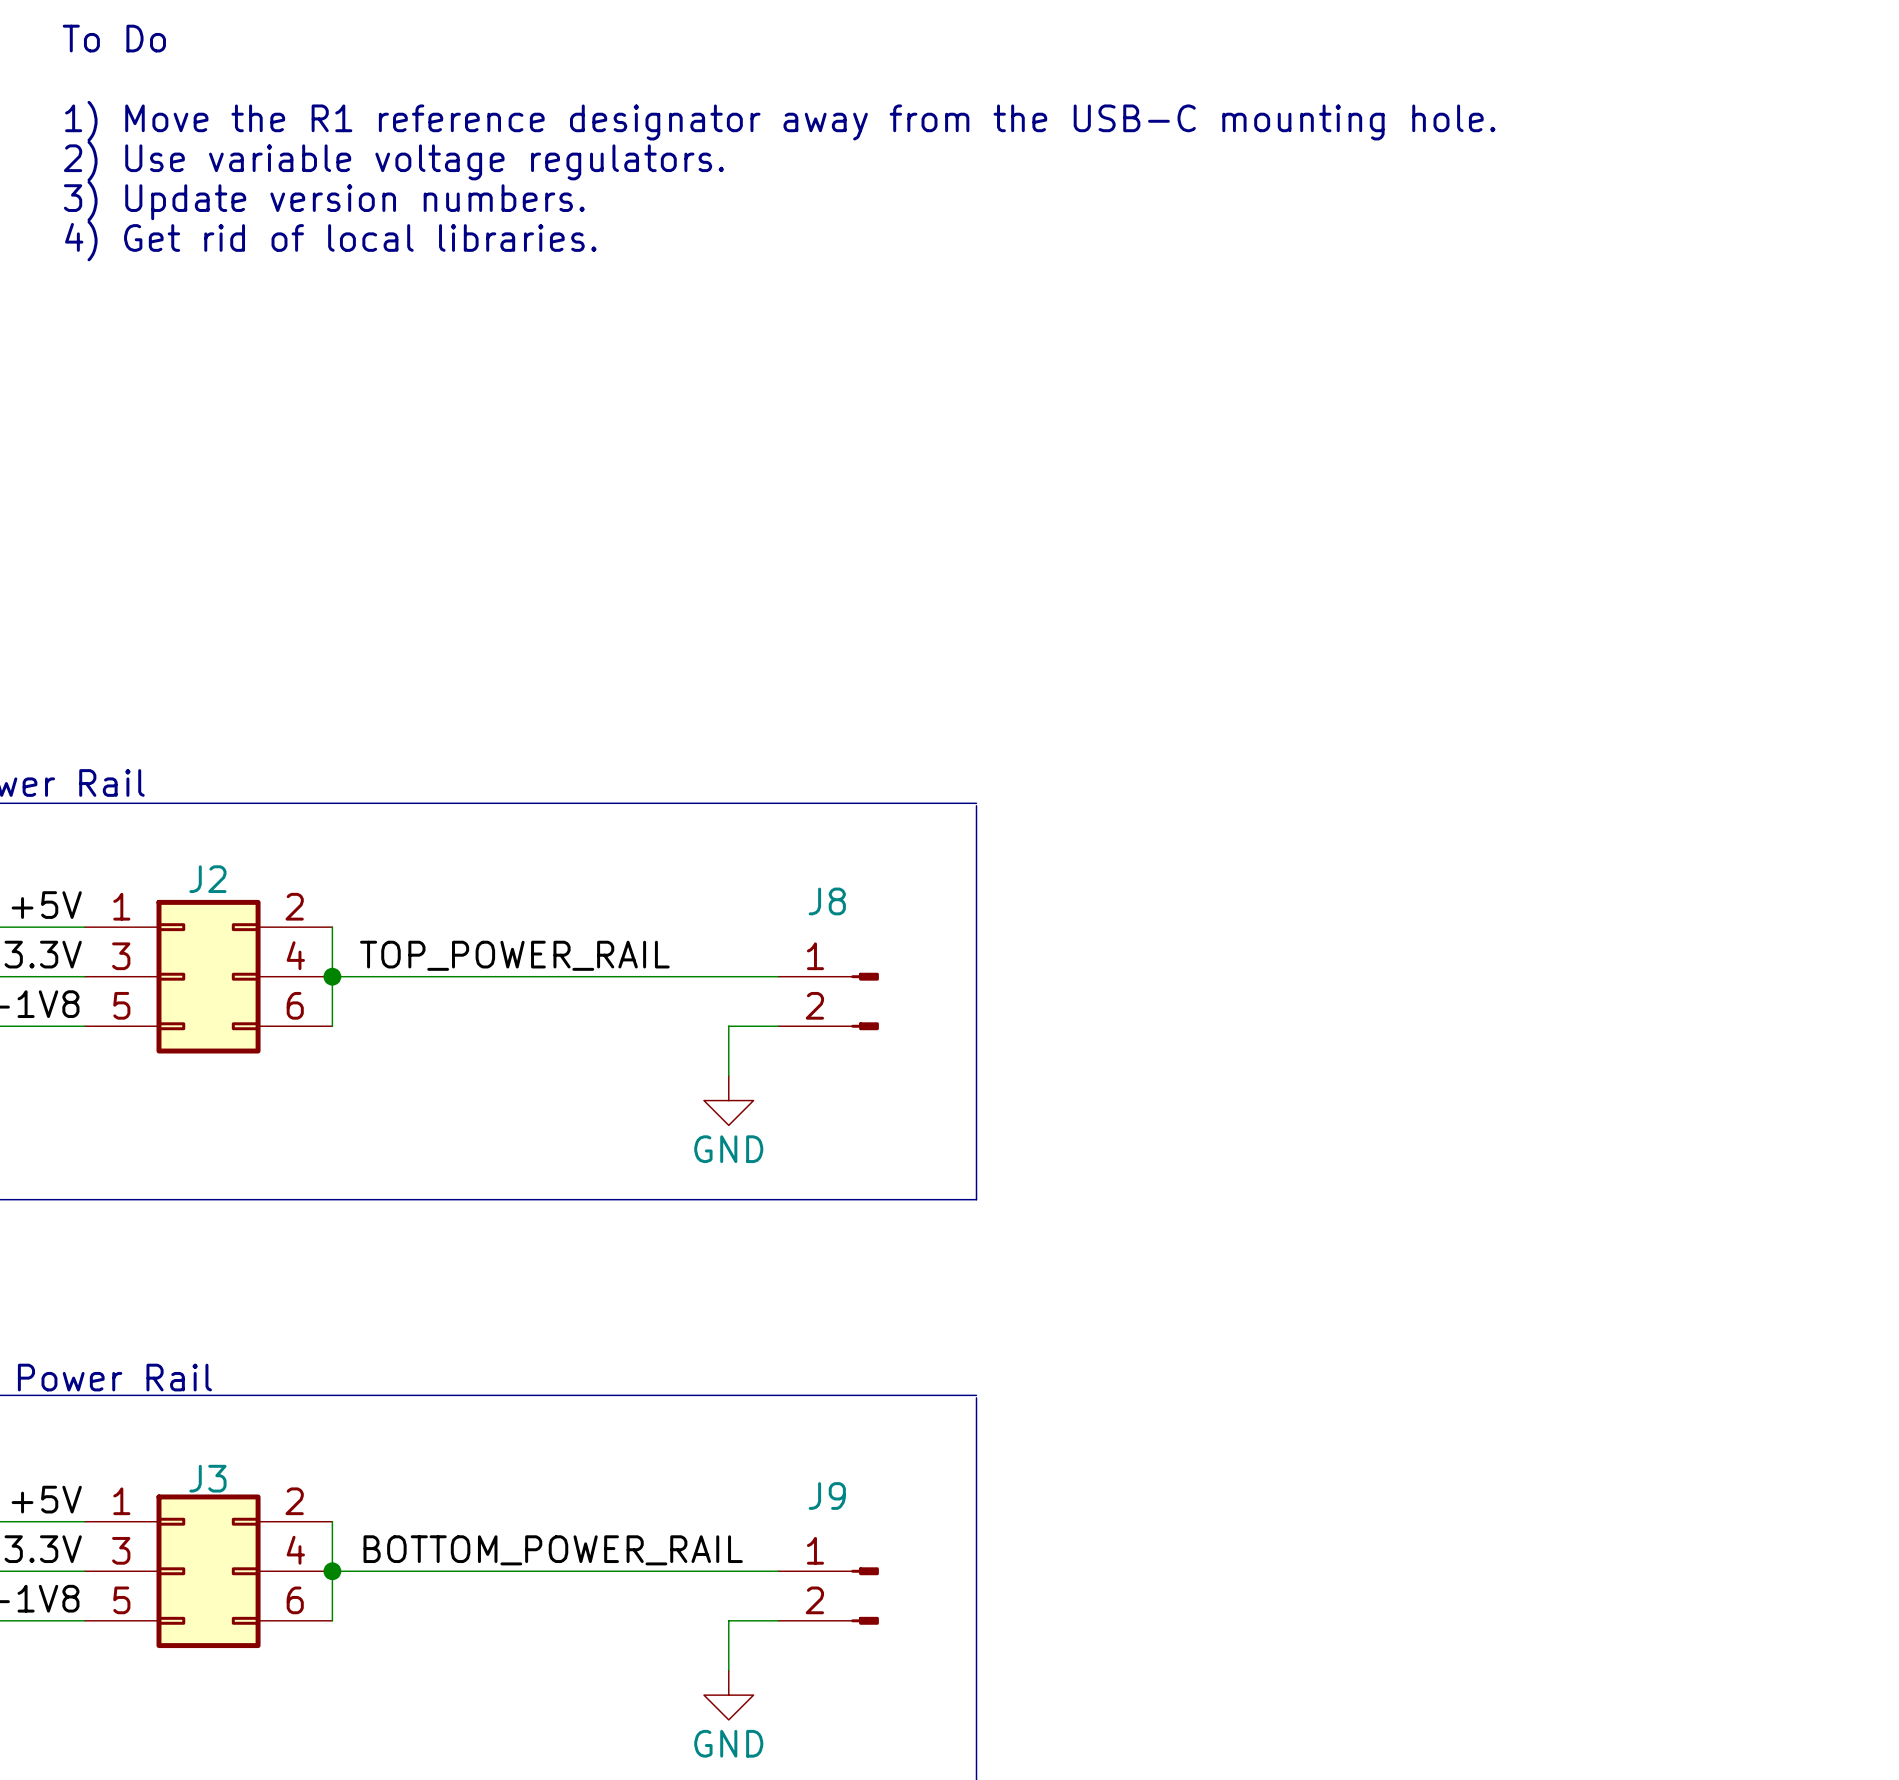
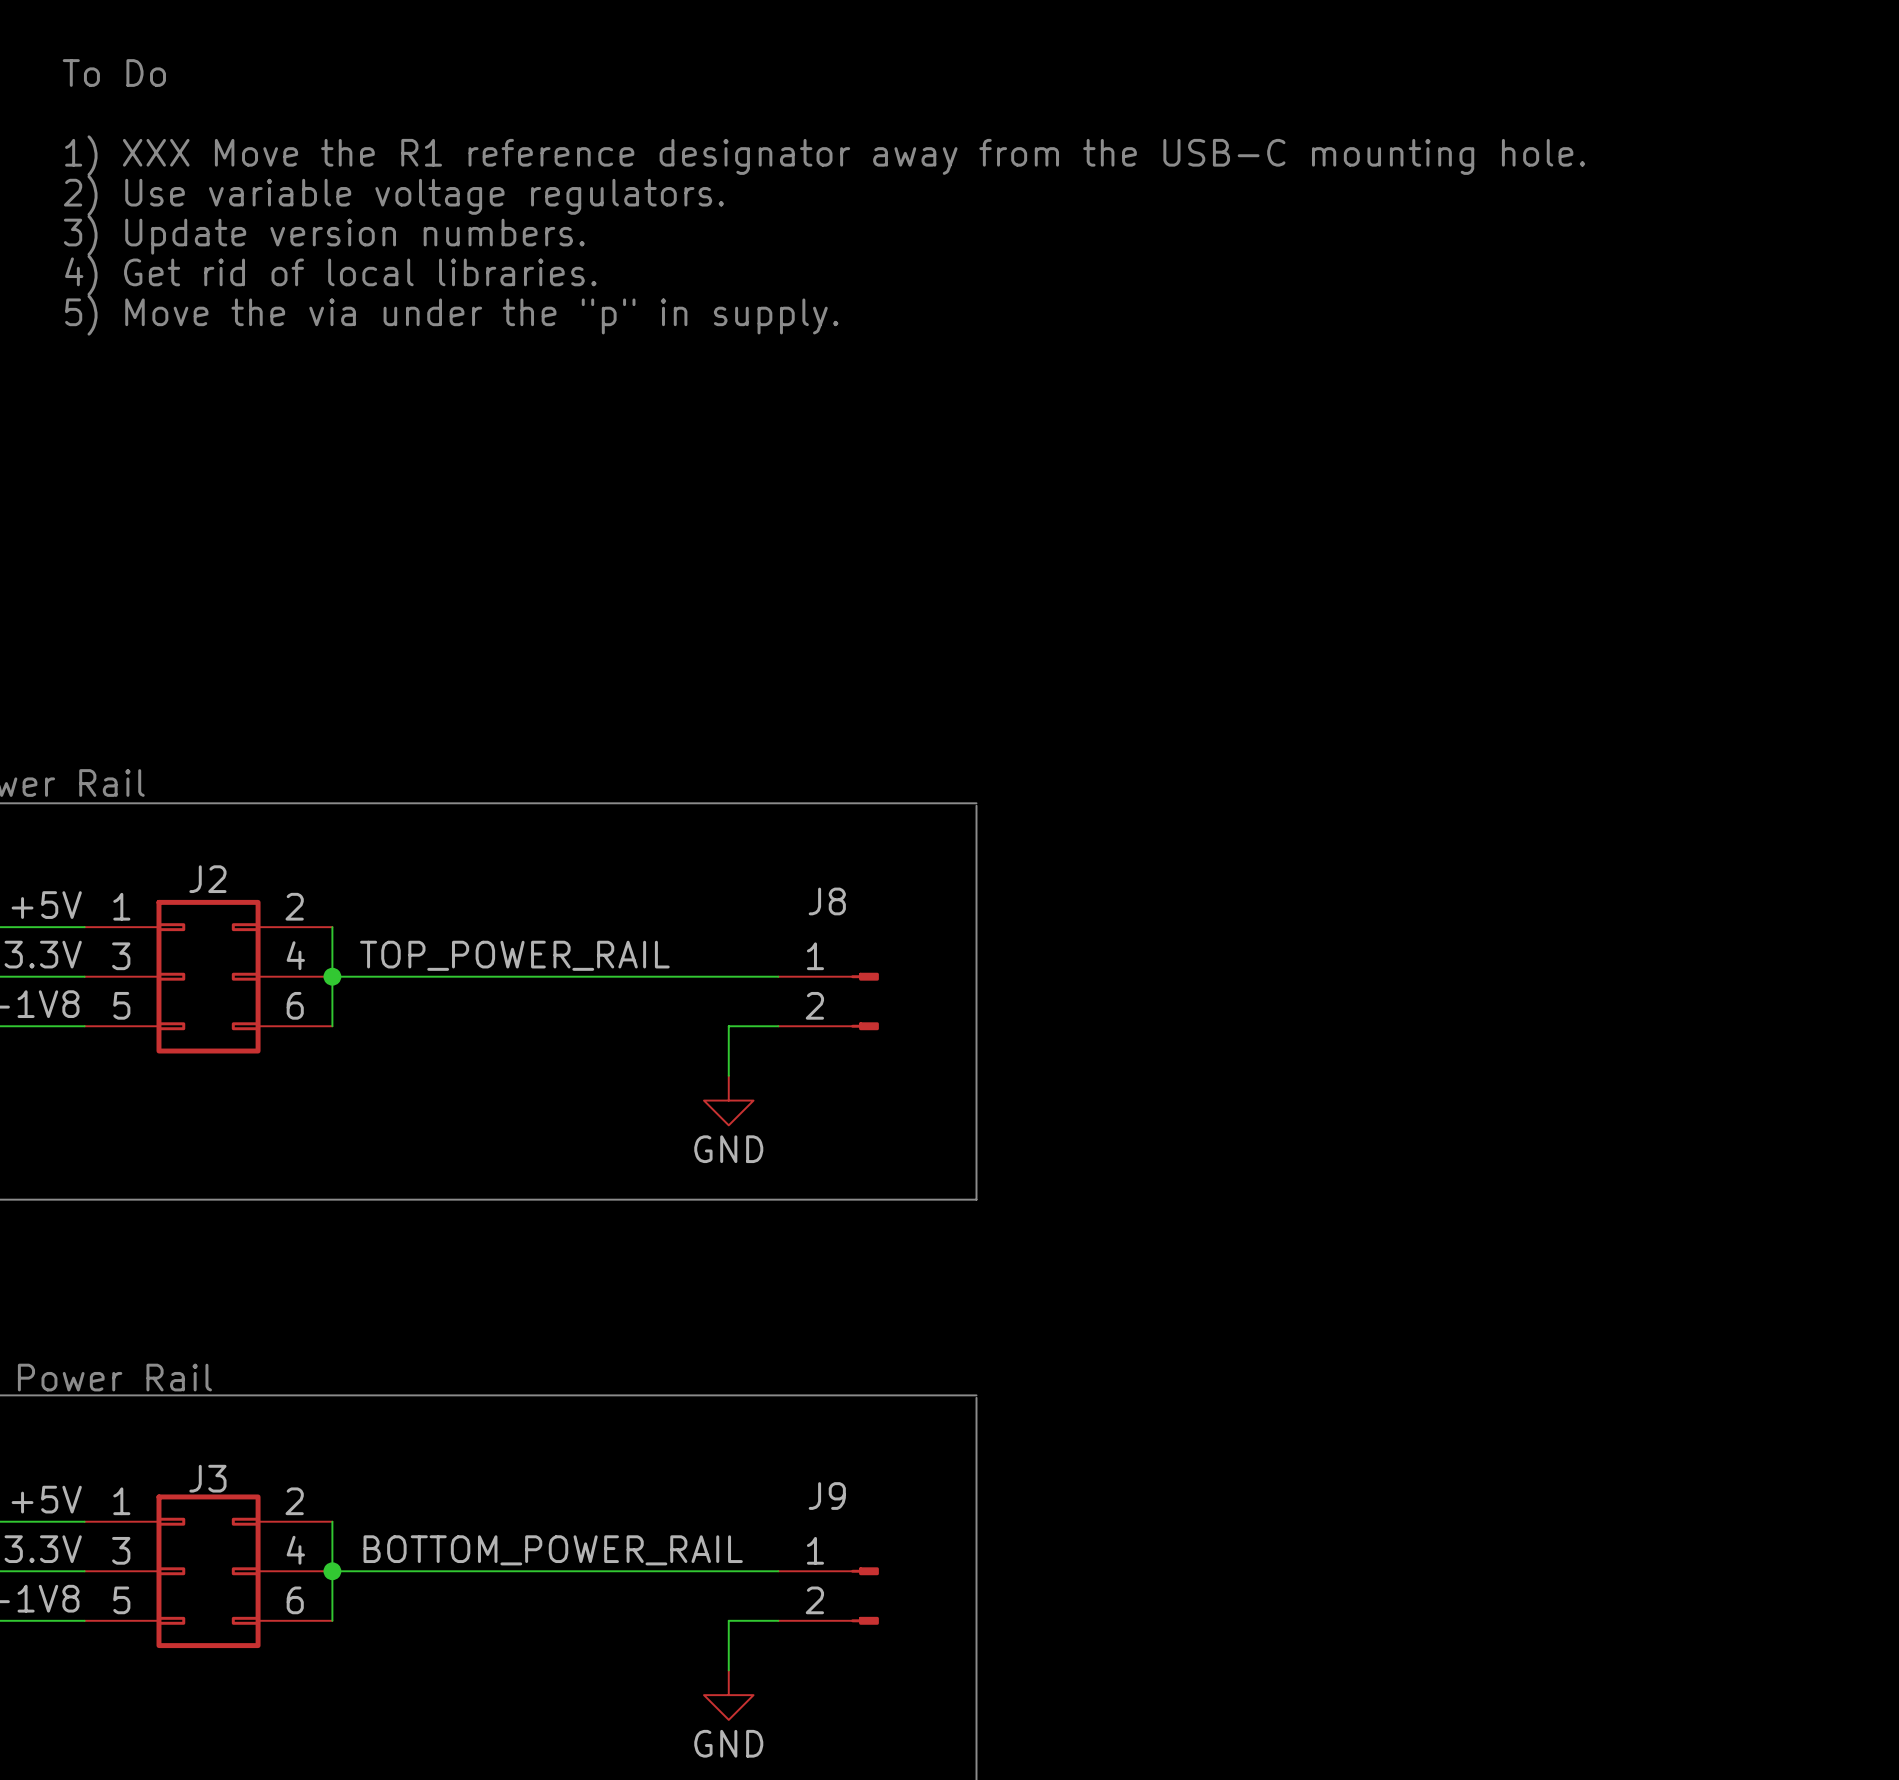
text position: To Do (114, 38) -> To Do (114, 72)
text: 1) Move the R1 reference designator away from the USB-C mounting hole. (780, 121) -> 1) XXX Move the R1 reference designator away from the USB-C mounting hole. (825, 155)
text position: 2) Use variable voltage regulators. (393, 161) -> 2) Use variable voltage regulators. (393, 195)
text position: 3) Update version numbers. (324, 201) -> 3) Update version numbers. (324, 235)
text position: 4) Get rid of local libraries. (330, 240) -> 4) Get rid of local libraries. (330, 275)
text: none -> 5) Move the via under the "p" in supply. (451, 315)

